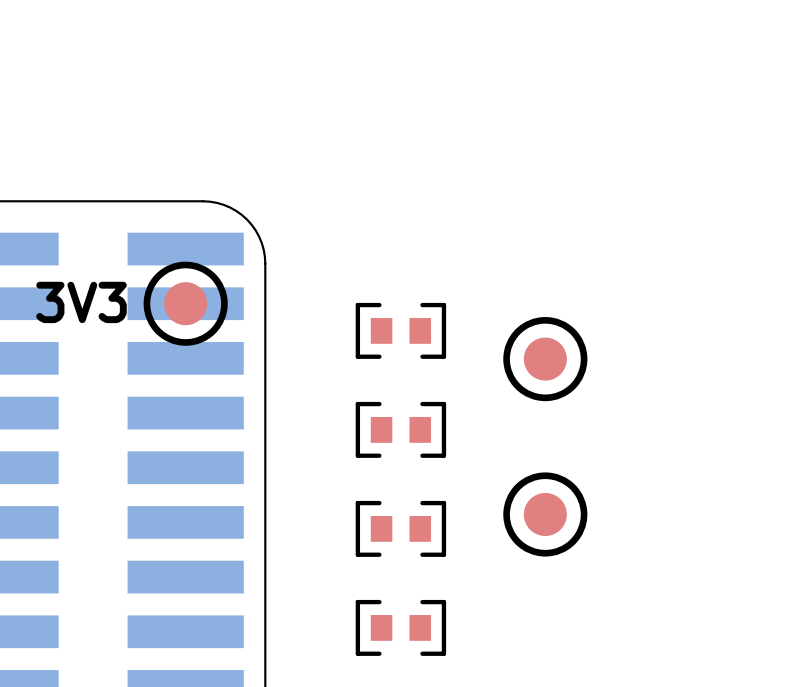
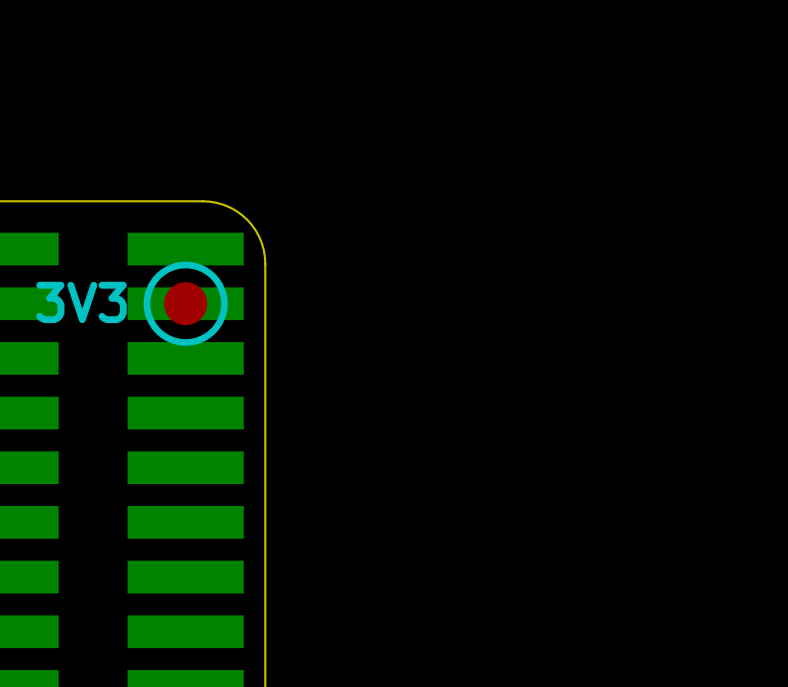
part: (400, 330) -> none
part: (545, 359) -> none
part: (400, 429) -> none
part: (545, 514) -> none
part: (400, 528) -> none
part: (400, 627) -> none

